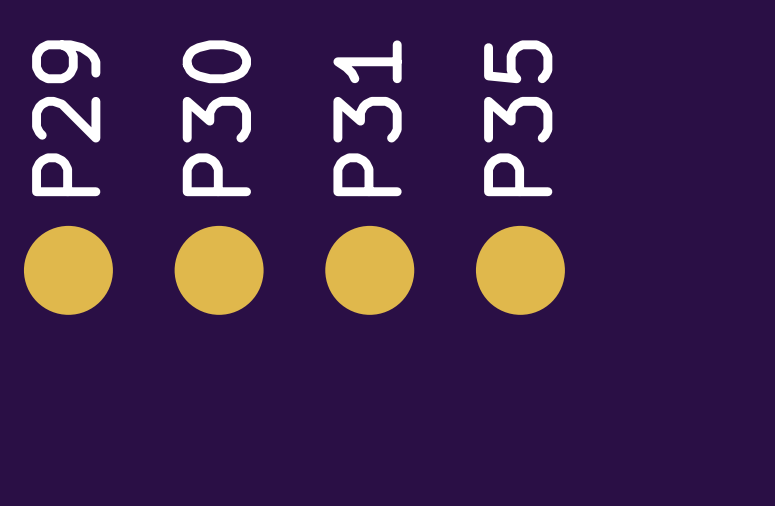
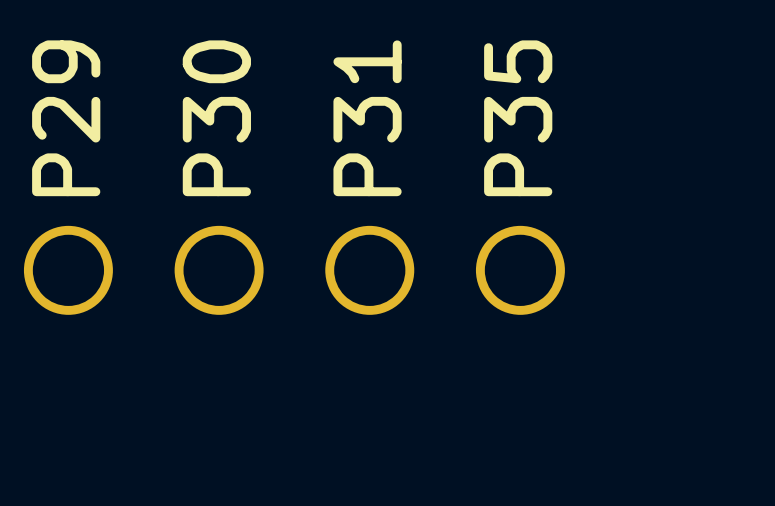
P29 footprint: [23, 225, 113, 315] -> [23, 225, 113, 315]
P30 footprint: [174, 225, 264, 315] -> [174, 225, 264, 315]
P31 footprint: [325, 225, 415, 315] -> [325, 225, 415, 315]
P35 footprint: [475, 225, 565, 315] -> [475, 225, 565, 315]

